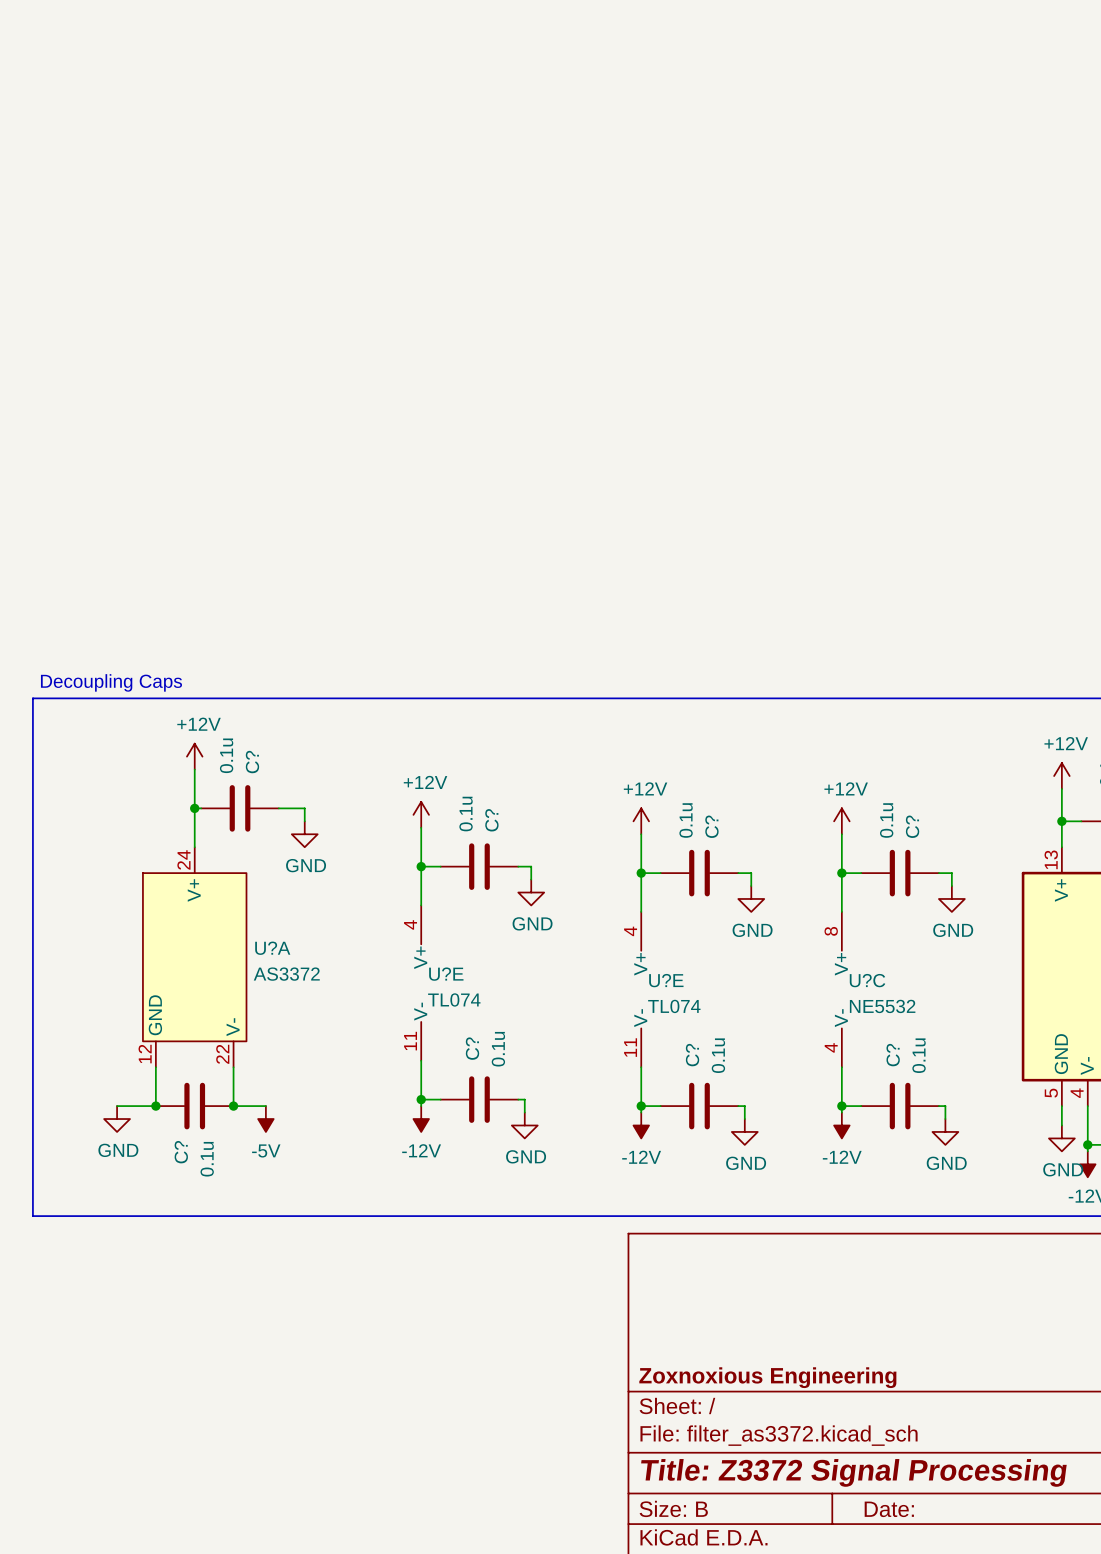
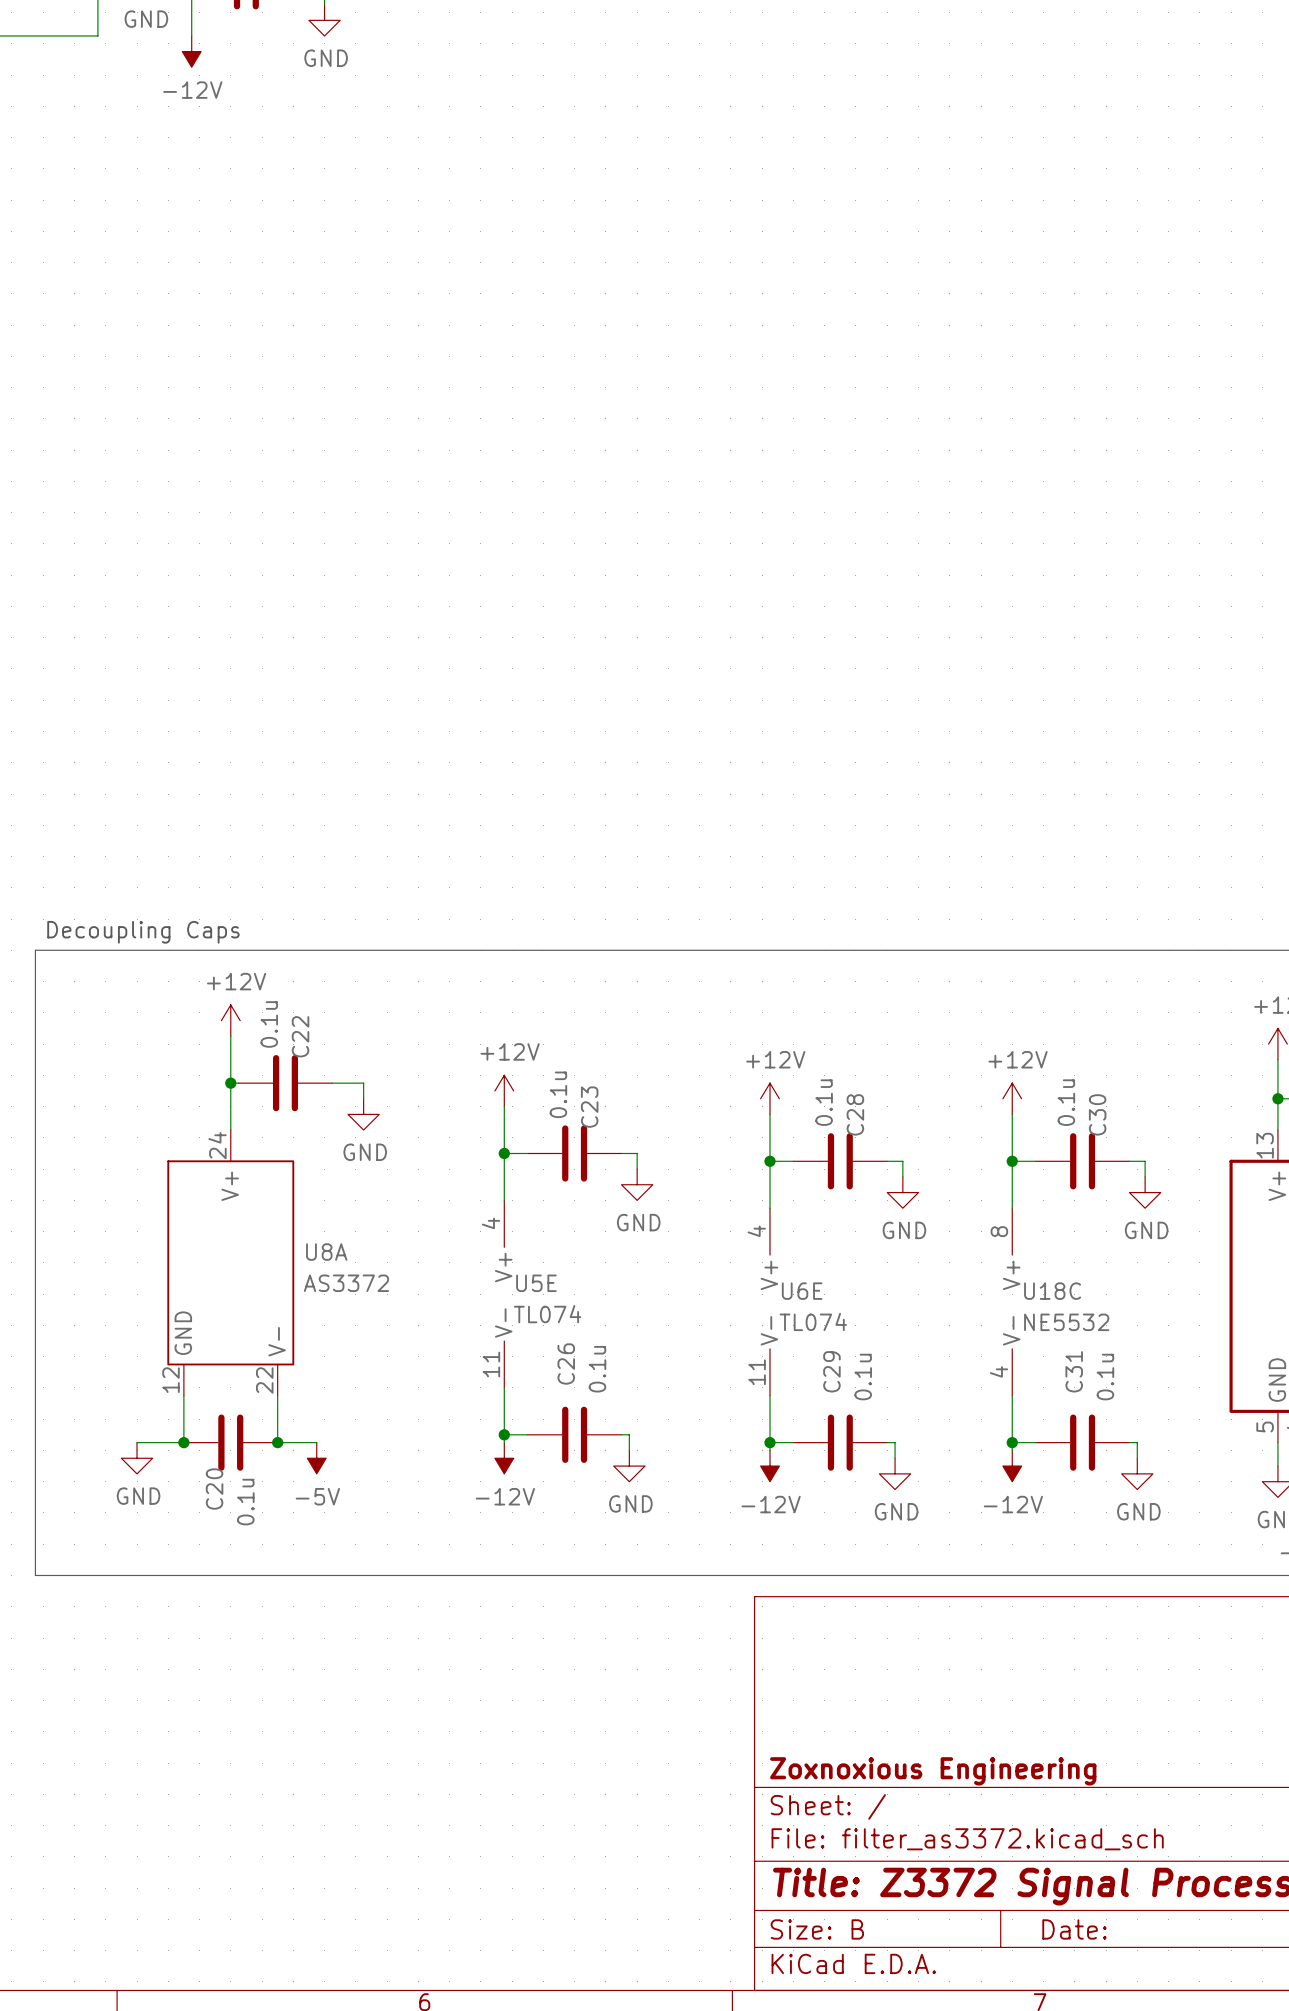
C? name: C? (252, 762) -> C22 (300, 1036)
C? name: C? (491, 820) -> C23 (589, 1107)
C? name: C? (711, 826) -> C28 (855, 1114)
C? name: C? (912, 826) -> C30 (1097, 1114)
U?A name: U?A (272, 948) -> U8A (326, 1252)
U?E name: U?E (446, 974) -> U5E (536, 1283)
U?E name: U?E (666, 980) -> U6E (802, 1291)
U?C name: U?C (867, 980) -> U18C (1052, 1291)
C? name: C? (472, 1048) -> C26 (566, 1363)
C? name: C? (692, 1055) -> C29 (831, 1371)
C? name: C? (893, 1055) -> C31 (1074, 1371)
C? name: C? (181, 1152) -> C20 (214, 1489)

